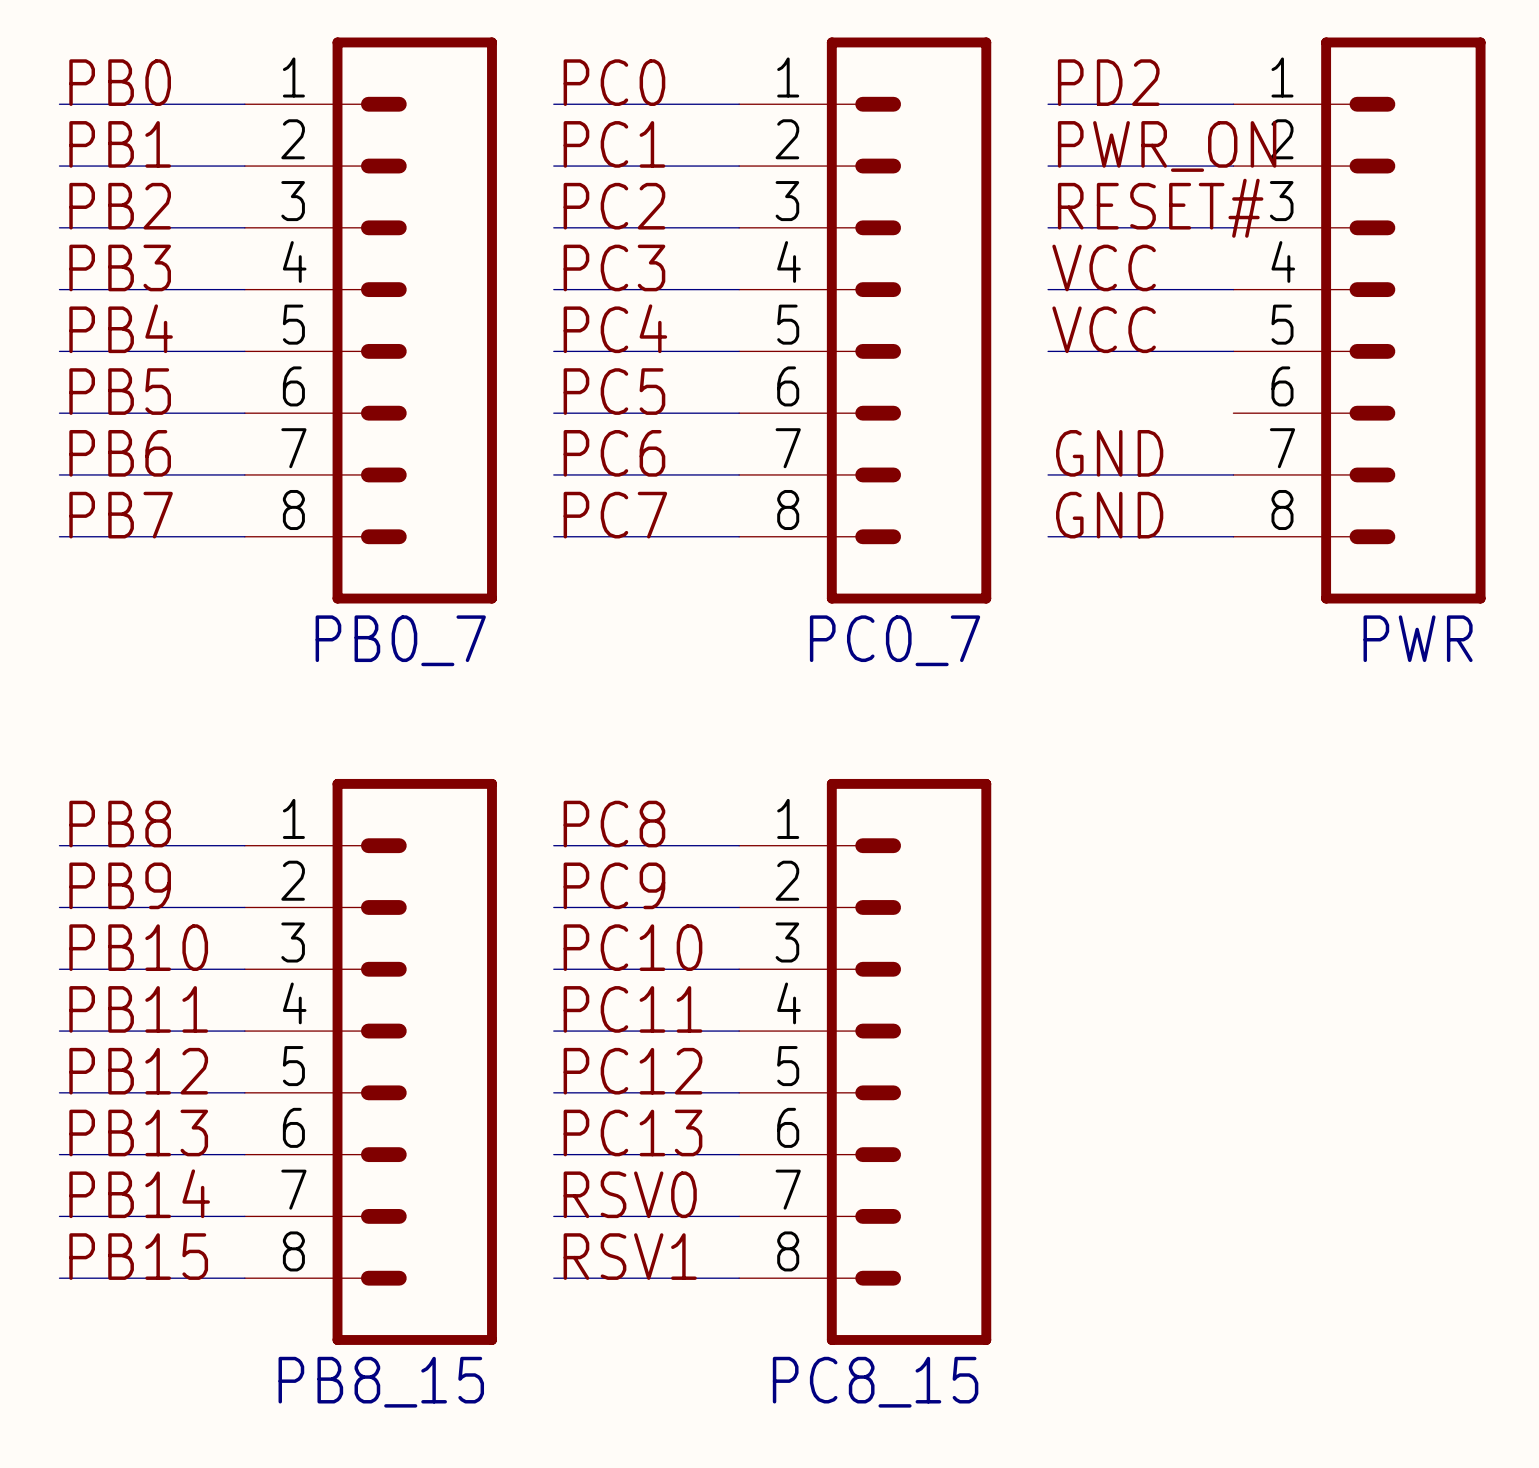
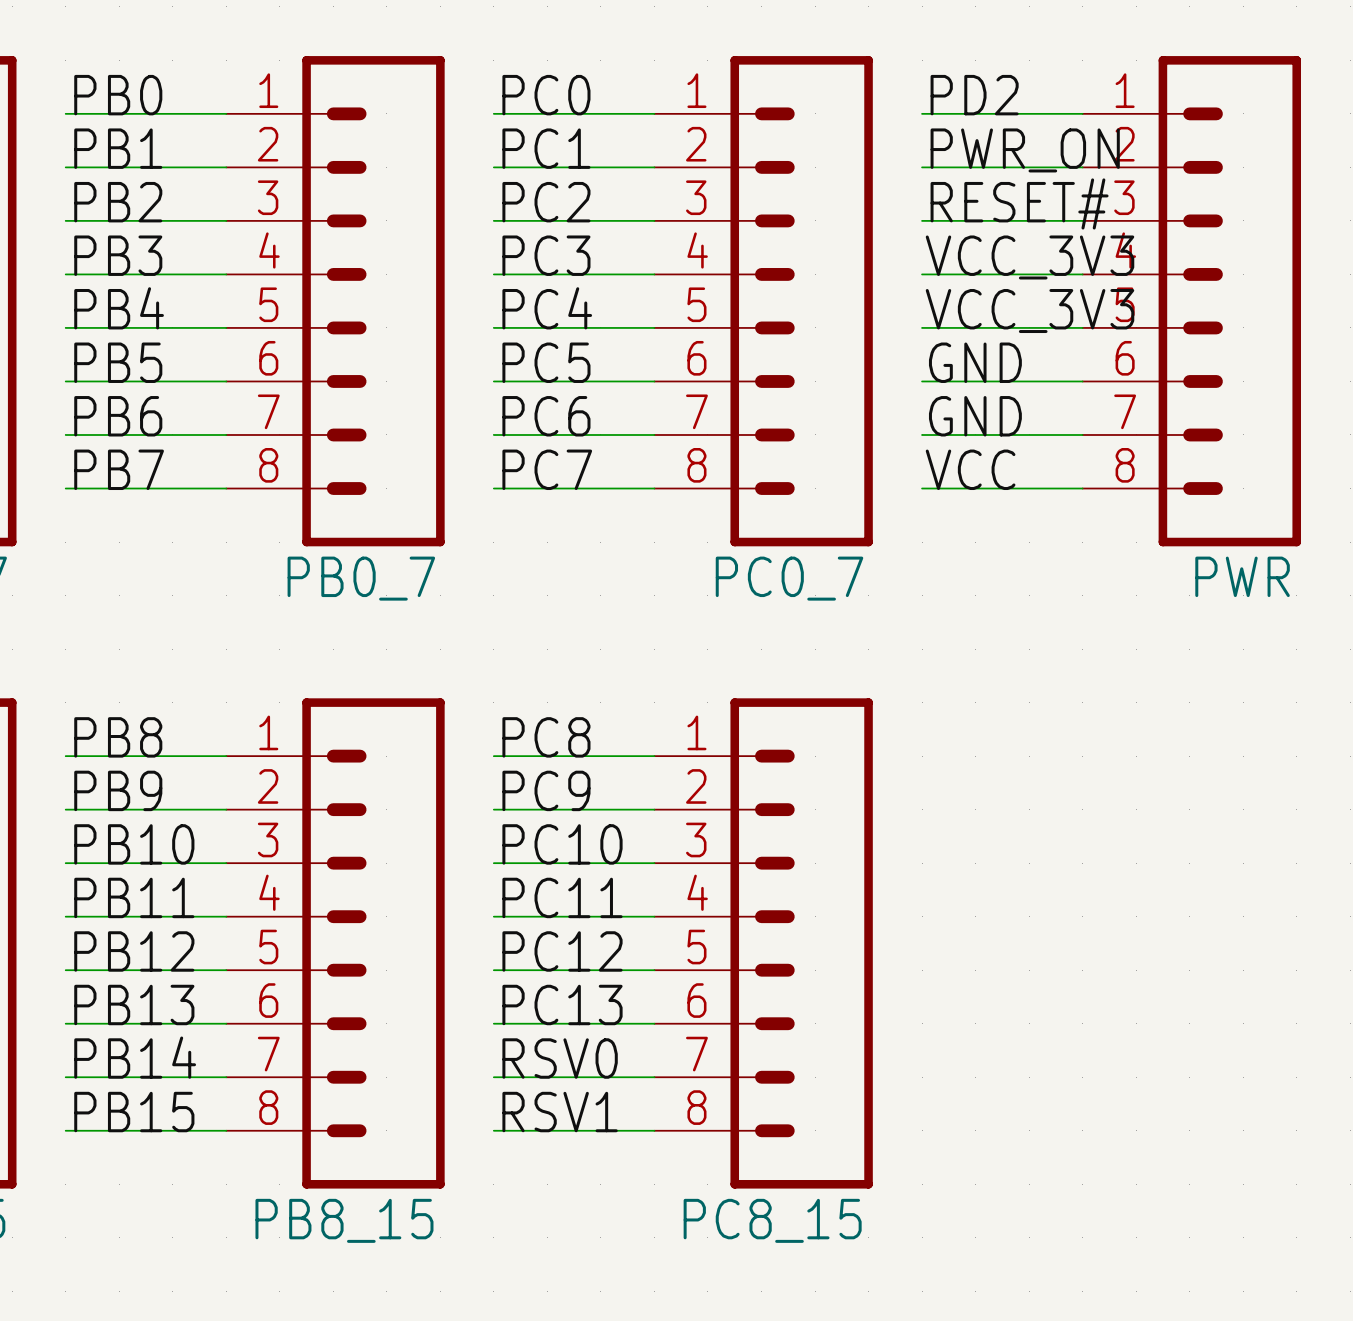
label: VCC (1104, 267) -> VCC_3V3 (1030, 257)
label: VCC (1104, 329) -> VCC_3V3 (1030, 311)
label: none -> GND (975, 362)
wire: none -> (922, 381) (1082, 381)
label: GND (1109, 515) -> VCC (970, 469)

